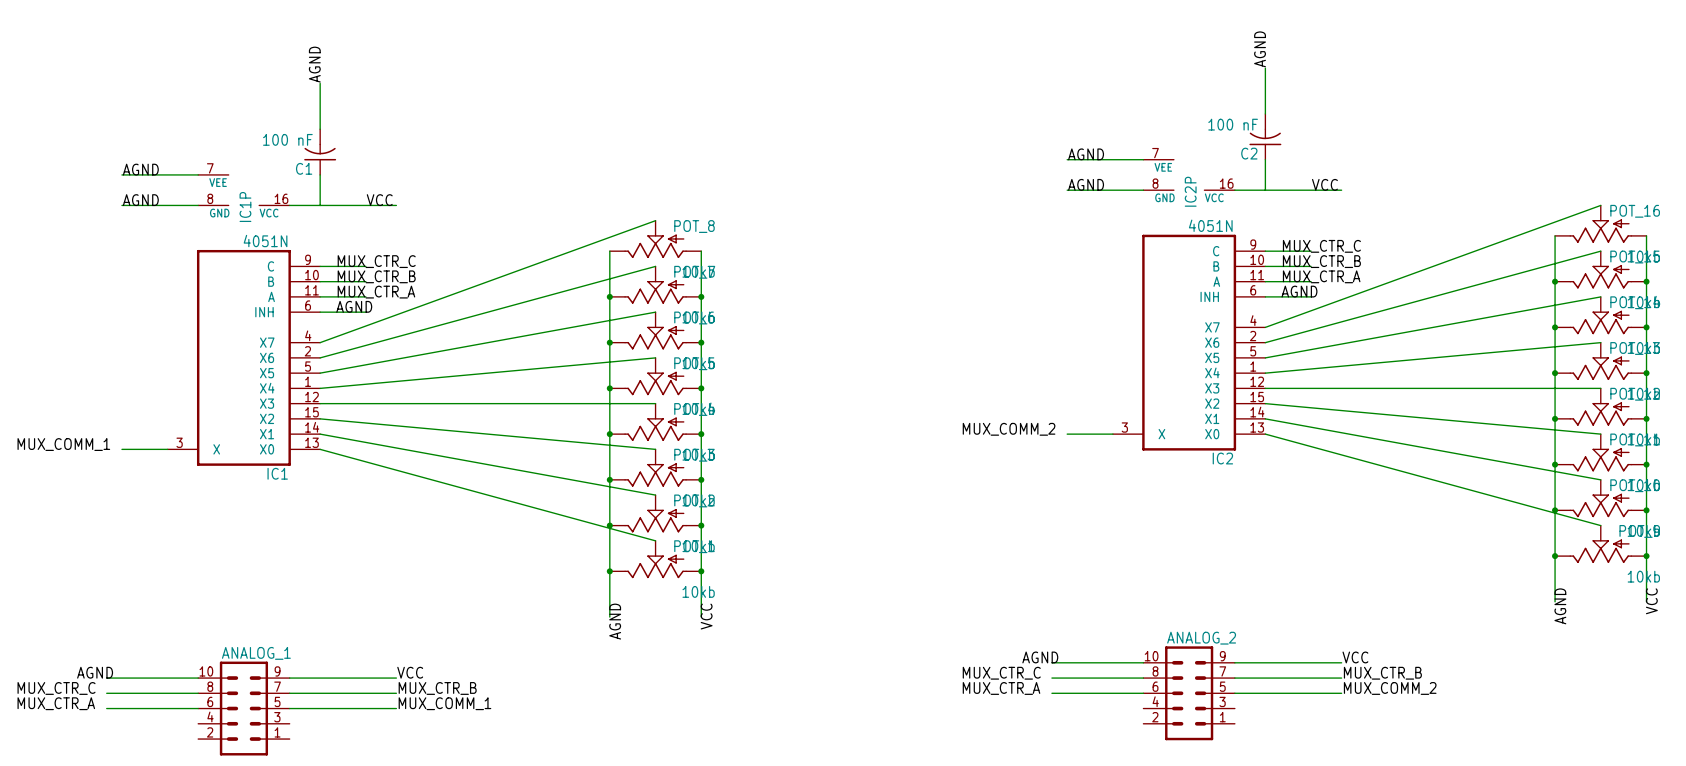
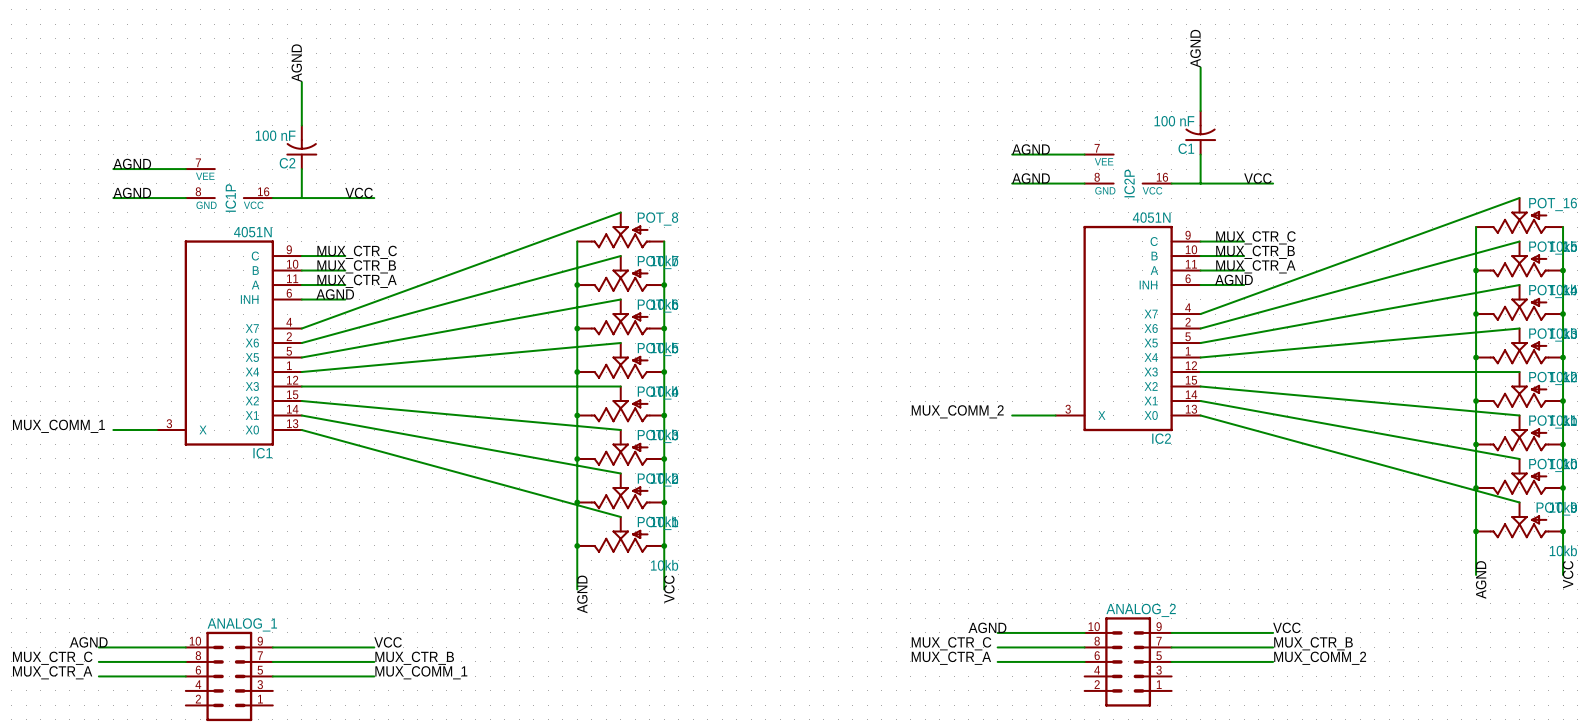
C2 name: C2 (1249, 153) -> C1 (1186, 148)
C1 name: C1 (304, 168) -> C2 (287, 163)

